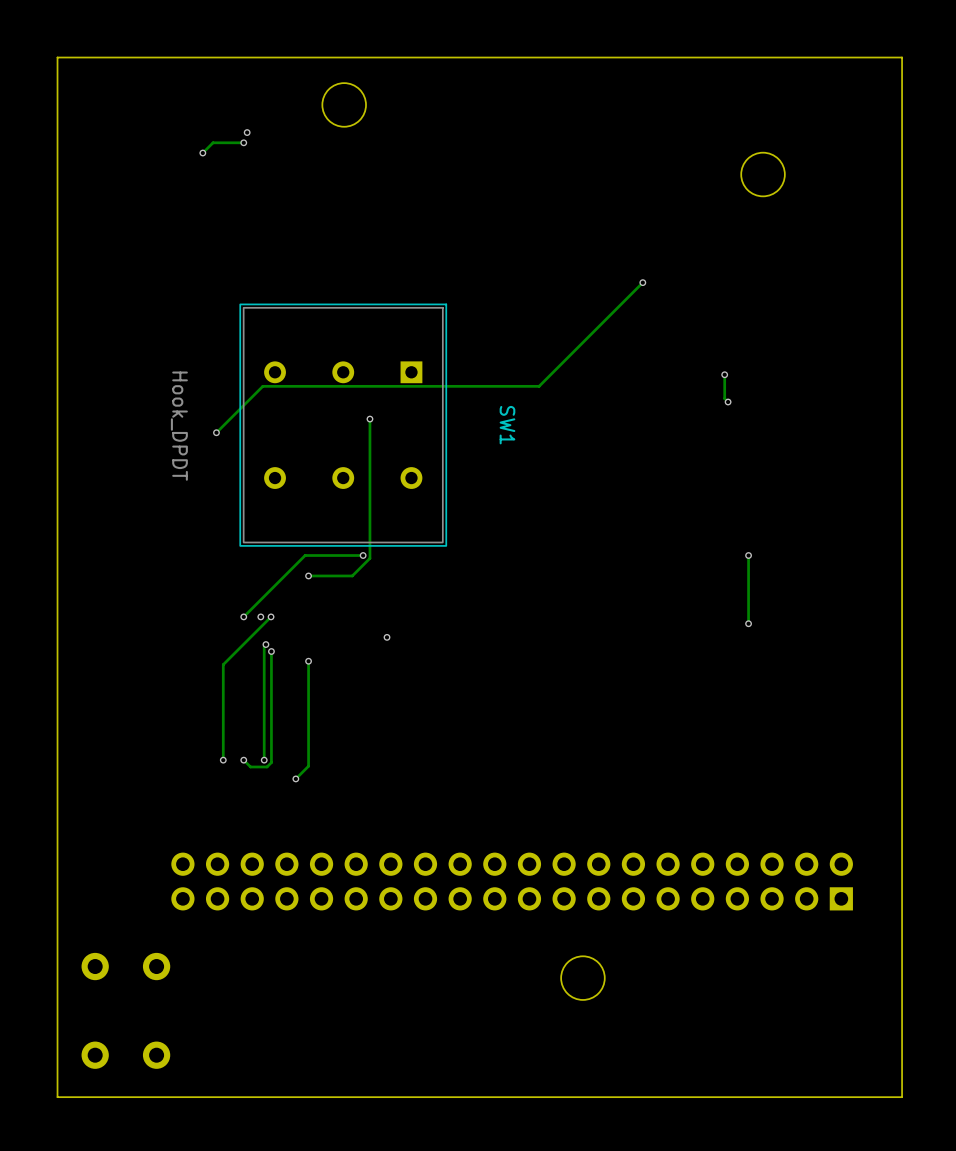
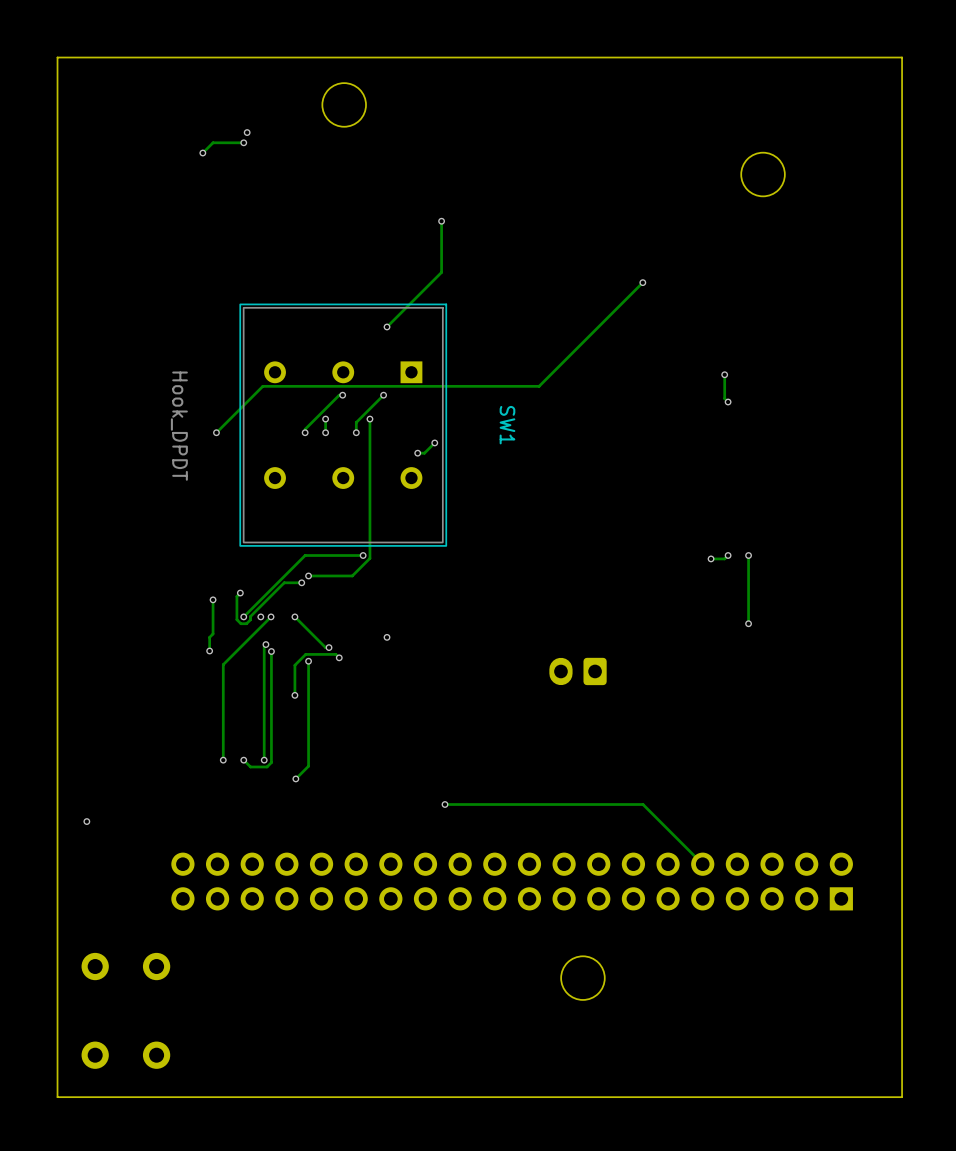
track: none -> (441, 221) (441, 272) (387, 326)
via: none -> (441, 221)
via: none -> (387, 326)
track: none -> (342, 395) (339, 395) (305, 429) (305, 432)
via: none -> (342, 395)
track: none -> (383, 395) (356, 422) (356, 432)
via: none -> (383, 395)
track: none -> (325, 419) (325, 432)
via: none -> (325, 419)
via: none -> (305, 432)
via: none -> (325, 432)
via: none -> (356, 432)
track: none -> (434, 442) (424, 453) (417, 453)
via: none -> (434, 442)
via: none -> (417, 453)
track: none -> (728, 555) (724, 558) (711, 558)
via: none -> (728, 555)
via: none -> (711, 558)
track: none -> (301, 582) (284, 582) (250, 616) (250, 619) (246, 623) (240, 623) (236, 619) (236, 596) (240, 593)
via: none -> (301, 582)
via: none -> (240, 593)
track: none -> (213, 599) (213, 633) (209, 637) (209, 651)
via: none -> (213, 599)
track: none -> (294, 616) (325, 647) (329, 647)
via: none -> (294, 616)
via: none -> (329, 647)
via: none -> (209, 651)
track: none -> (339, 657) (335, 654) (305, 654) (294, 665) (294, 695)
via: none -> (339, 657)
part: none -> (578, 671)
via: none -> (294, 695)
track: none -> (444, 804) (643, 804) (702, 864)
via: none -> (444, 804)
via: none -> (86, 821)

